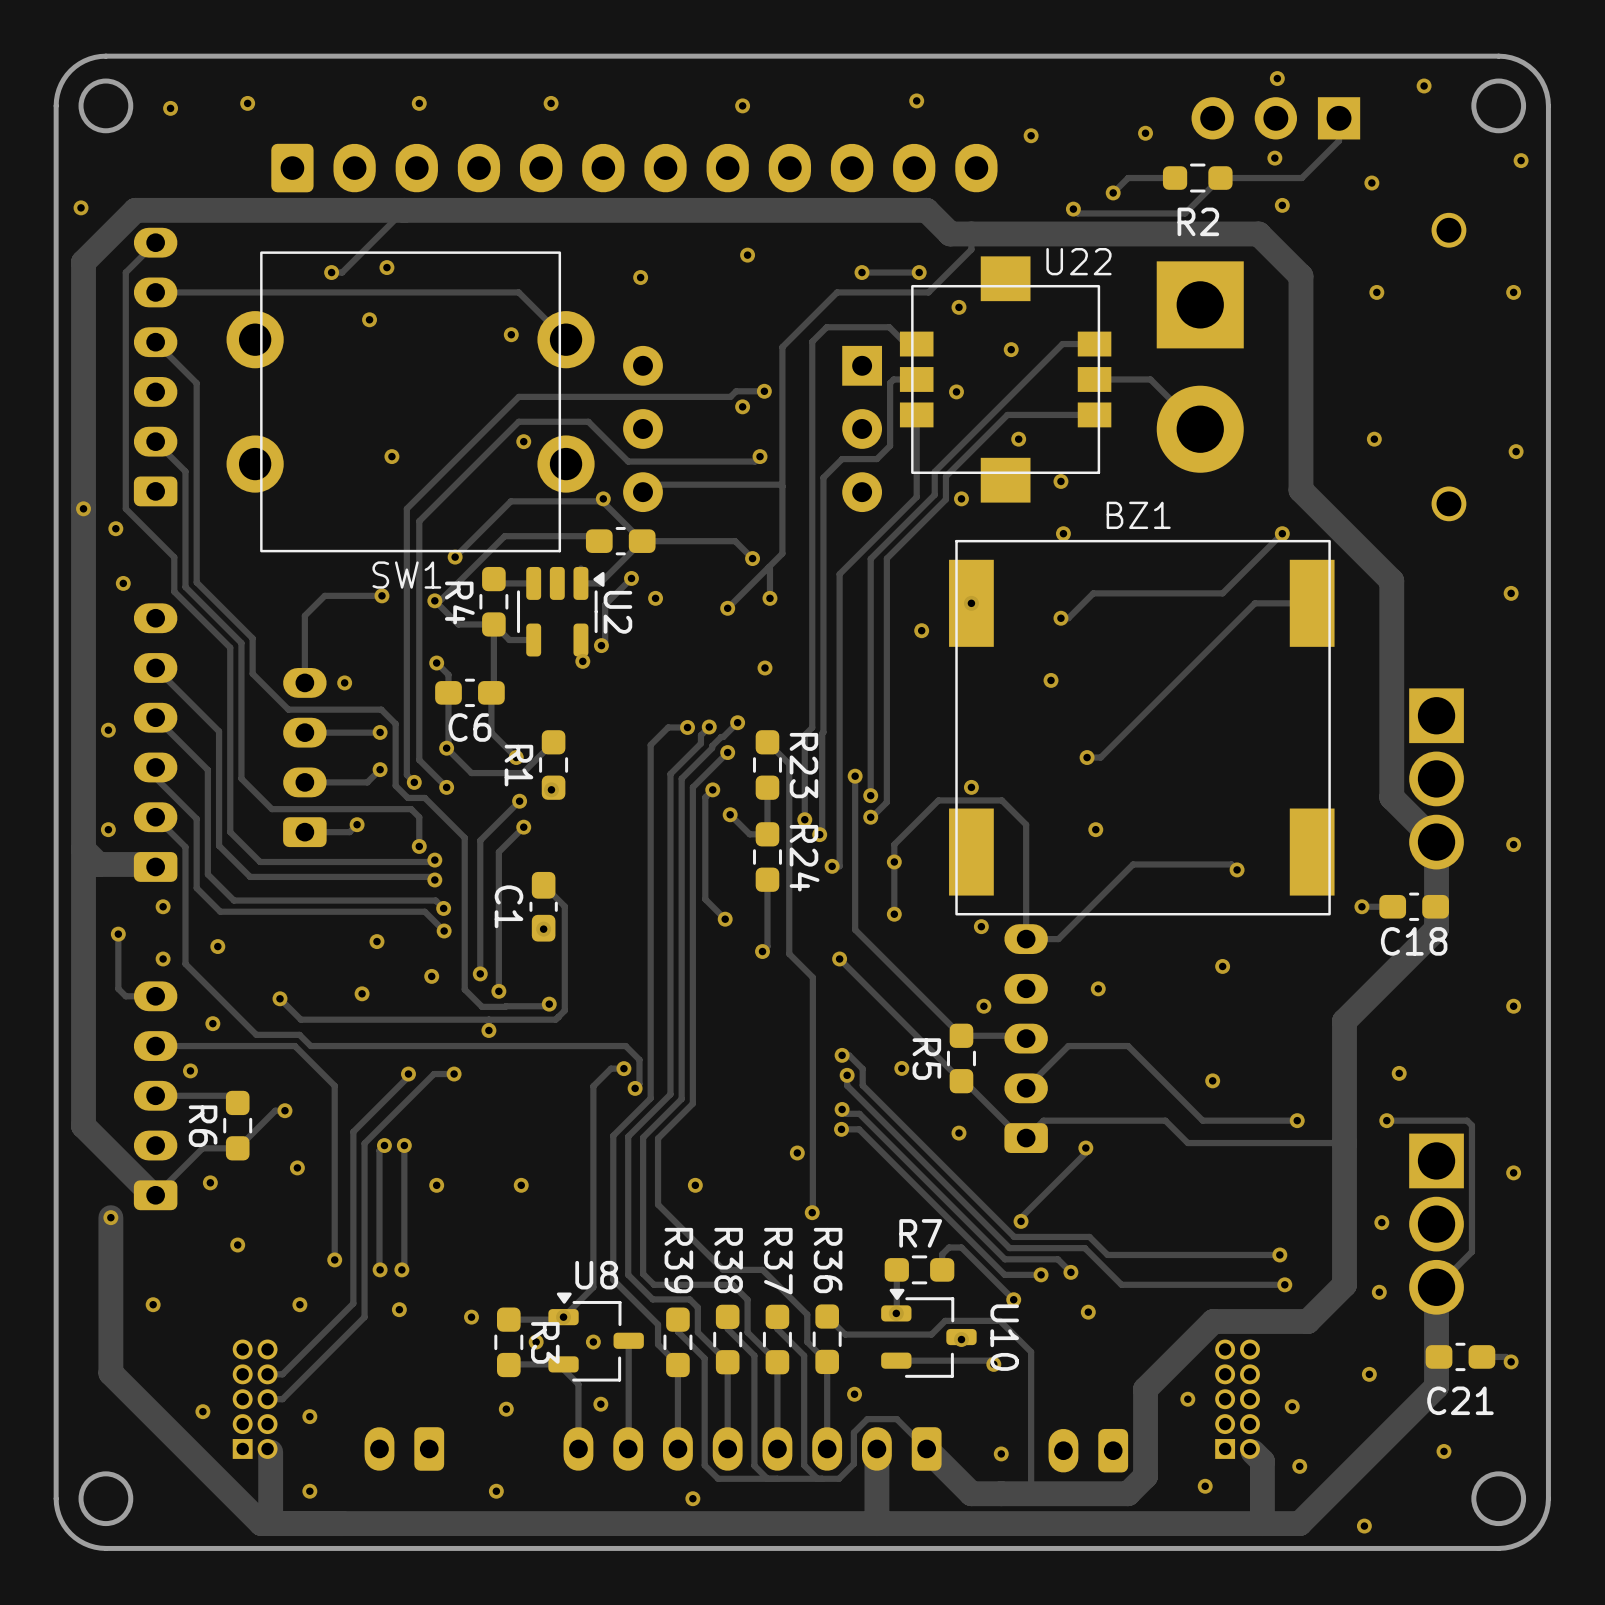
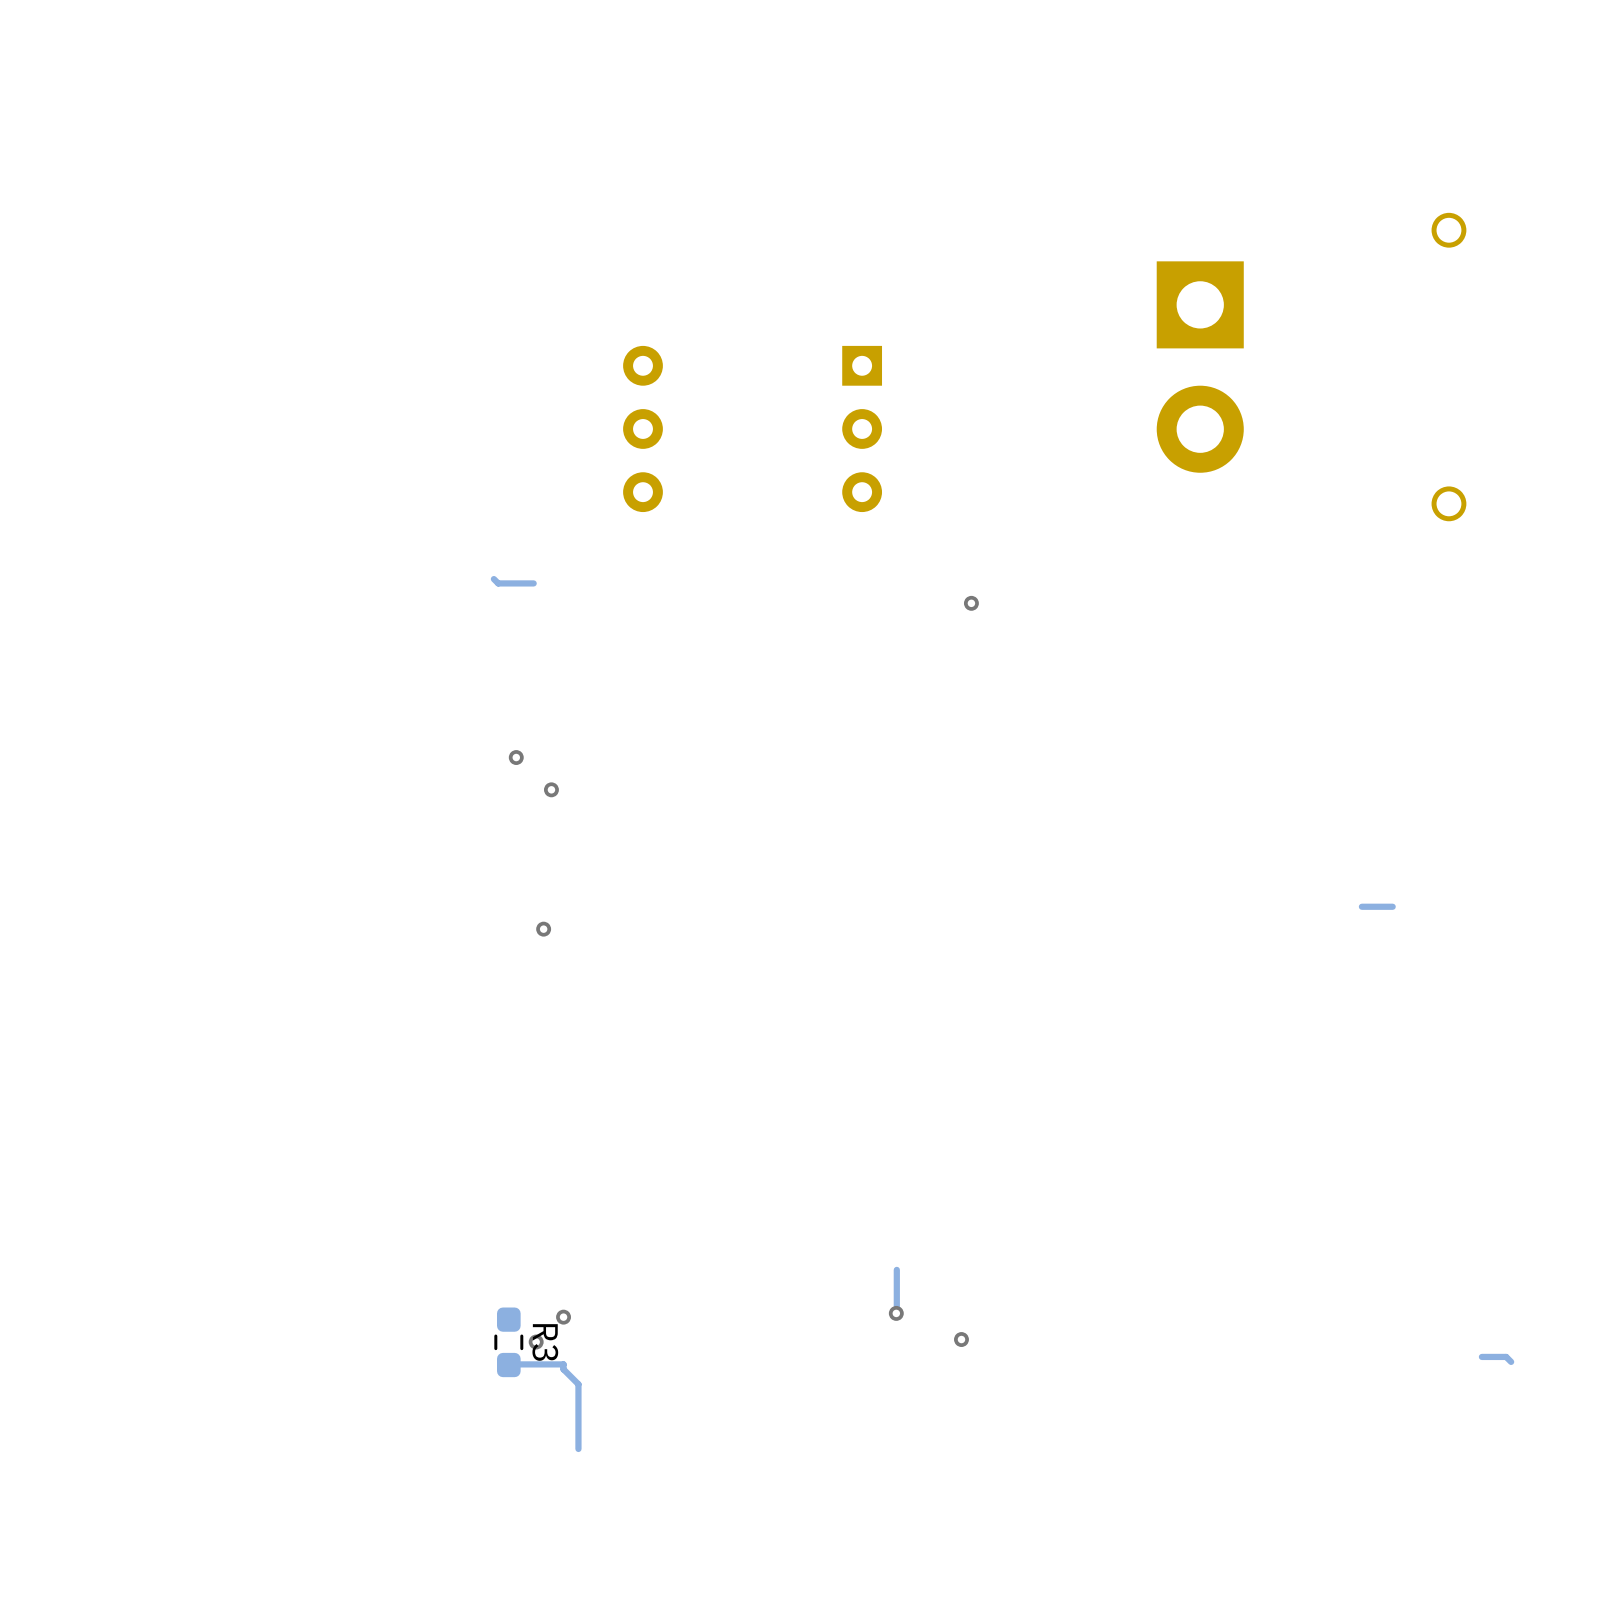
board edge: (1498, 56) (105, 56) (89, 58) (70, 70) (58, 89) (56, 105) (56, 1498) (61, 1520) (70, 1533) (89, 1545) (105, 1548) (1498, 1548) (1517, 1544) (1533, 1533) (1544, 1517) (1548, 1498) (1548, 105) (1544, 86) (1533, 70) (1517, 59) (1498, 56) -> none
round board edge: [78, 78, 134, 134] -> none
via: (1277, 78) -> none
round board edge: [1471, 78, 1527, 134] -> none
via: (1424, 86) -> none
via: (916, 100) -> none
via: (247, 103) -> none
via: (419, 103) -> none
via: (551, 103) -> none
via: (742, 105) -> none
via: (170, 108) -> none
part: (1275, 118) -> none
track: (1339, 118) (1339, 140) (1301, 178) (1220, 178) (1185, 213) (1077, 213) (1073, 209) -> none
via: (1145, 133) -> none
via: (1031, 135) -> none
via: (1274, 158) -> none
via: (1521, 160) -> none
part: (634, 168) -> none
track: (1175, 178) (1128, 178) (1113, 192) -> none
R2: (1197, 178) -> none
via: (1371, 183) -> none
via: (1113, 192) -> none
via: (1282, 205) -> none
via: (81, 207) -> none
via: (1073, 209) -> none
track: (404, 210) (342, 272) (331, 272) -> none
track: (971, 233) (971, 249) (928, 292) (837, 292) (782, 347) (782, 553) (727, 608) -> none
track: (155, 242) (125, 272) (125, 508) (174, 557) (174, 591) (230, 647) (230, 832) (260, 861) (430, 861) (434, 860) -> none
via: (747, 255) -> none
via: (386, 267) -> none
via: (331, 272) -> none
via: (861, 272) -> none
track: (919, 272) (861, 272) -> none
via: (919, 272) -> none
via: (640, 277) -> none
track: (155, 292) (518, 292) (566, 339) -> none
via: (1376, 292) -> none
via: (1513, 292) -> none
via: (958, 307) -> none
via: (369, 319) -> none
via: (511, 334) -> none
track: (155, 342) (196, 383) (196, 582) (252, 638) (252, 673) (288, 709) (381, 709) (395, 723) (395, 785) (407, 797) (424, 797) (464, 837) (464, 989) (482, 1006) (547, 1006) (549, 1004) -> none
track: (916, 344) (906, 344) (889, 327) (826, 327) (812, 341) (812, 727) (804, 735) (804, 819) -> none
track: (1094, 344) (1062, 344) (934, 471) (934, 494) (870, 558) (870, 795) -> none
via: (1011, 349) -> none
part: (155, 367) -> none
track: (916, 379) (893, 379) (890, 383) (890, 445) (876, 459) (842, 459) (823, 477) (823, 732) (822, 832) (819, 834) -> none
U22: (1005, 379) -> none
track: (1094, 379) (1150, 379) (1200, 429) -> none
track: (764, 391) (736, 391) (730, 396) (518, 396) (406, 508) (406, 774) (414, 782) -> none
via: (764, 391) -> none
via: (956, 391) -> none
SW1: (410, 401) -> none
via: (742, 406) -> none
track: (916, 414) (916, 497) (839, 574) (839, 866) -> none
track: (1094, 414) (1007, 414) (945, 476) (945, 499) (886, 558) (886, 802) (870, 817) -> none
via: (1018, 439) -> none
via: (1374, 439) -> none
track: (155, 441) (185, 471) (185, 587) (241, 643) (241, 778) (271, 809) (411, 809) (419, 817) (419, 846) -> none
via: (523, 441) -> none
via: (1516, 451) -> none
via: (391, 456) -> none
track: (760, 456) (755, 461) (628, 461) (588, 421) (518, 421) (419, 521) (419, 760) (446, 787) -> none
via: (760, 456) -> none
track: (643, 476) (643, 492) (650, 484) (780, 484) (782, 486) -> none
via: (1060, 481) -> none
via: (603, 498) -> none
via: (961, 498) -> none
via: (83, 508) -> none
via: (115, 528) -> none
via: (1063, 533) -> none
track: (1282, 533) (1222, 593) (1093, 593) (1068, 618) (1060, 618) -> none
via: (1282, 533) -> none
track: (599, 541) (594, 536) (504, 536) (440, 600) (434, 600) -> none
part: (620, 541) -> none
track: (642, 541) (735, 541) (752, 558) -> none
track: (642, 541) (602, 501) (510, 501) (455, 557) -> none
track: (642, 541) (599, 583) (580, 583) (580, 568) -> none
via: (455, 557) -> none
via: (752, 558) -> none
track: (768, 567) (769, 598) -> none
track: (631, 578) (605, 604) (605, 641) (601, 645) -> none
via: (631, 578) -> none
via: (123, 583) -> none
via: (1511, 593) -> none
track: (381, 595) (324, 595) (304, 615) (304, 682) -> none
via: (381, 595) -> none
via: (655, 598) -> none
via: (769, 598) -> none
track: (434, 600) (458, 624) (493, 624) (491, 732) (516, 757) -> none
via: (434, 600) -> none
R4: (493, 601) -> none
track: (1312, 603) (1254, 603) (1100, 757) (1087, 757) -> none
via: (727, 608) -> none
U2: (560, 611) -> none
via: (1060, 618) -> none
track: (492, 623) (509, 640) (533, 640) -> none
via: (921, 630) -> none
via: (601, 645) -> none
via: (582, 661) -> none
track: (436, 663) (448, 674) (448, 746) (446, 748) (471, 773) (522, 773) (553, 742) -> none
via: (436, 663) -> none
track: (155, 667) (219, 731) (219, 845) (250, 876) (431, 876) (434, 879) -> none
via: (764, 667) -> none
via: (1051, 680) -> none
via: (344, 682) -> none
C6: (469, 692) -> none
track: (155, 717) (207, 769) (207, 874) (233, 900) (435, 900) (443, 908) -> none
track: (737, 722) (681, 778) (681, 1099) (643, 1137) (643, 1273) (653, 1284) (732, 1284) (747, 1299) (747, 1332) (777, 1362) (777, 1448) -> none
via: (737, 722) -> none
track: (687, 727) (668, 727) (650, 745) (650, 1098) (613, 1135) (613, 1279) (658, 1324) (658, 1344) (677, 1364) (677, 1448) -> none
via: (687, 727) -> none
track: (709, 727) (700, 735) (700, 743) (670, 774) (670, 1094) (628, 1136) (628, 1274) (652, 1299) (689, 1299) (697, 1307) (697, 1332) (727, 1362) (727, 1448) -> none
via: (709, 727) -> none
BZ1: (1141, 727) -> none
via: (108, 730) -> none
track: (379, 732) (304, 732) -> none
via: (380, 732) -> none
part: (155, 742) -> none
track: (767, 742) (789, 764) (789, 953) (812, 977) (812, 1212) -> none
via: (446, 748) -> none
track: (727, 752) (692, 787) (692, 1103) (658, 1138) (658, 1204) (723, 1269) (762, 1269) (807, 1314) (807, 1342) (827, 1361) (827, 1448) -> none
via: (727, 752) -> none
part: (304, 757) -> none
via: (1087, 757) -> none
R1: (553, 764) -> none
R23: (767, 764) -> none
track: (155, 767) (155, 777) (196, 818) (196, 888) (220, 911) (424, 911) (444, 931) -> none
track: (380, 769) (367, 782) (304, 782) -> none
via: (380, 769) -> none
track: (855, 776) (855, 929) (961, 1035) (1023, 1035) (1026, 1038) -> none
via: (855, 776) -> none
part: (1436, 778) -> none
via: (414, 782) -> none
via: (446, 787) -> none
track: (767, 787) (767, 834) (749, 834) (730, 814) -> none
via: (971, 787) -> none
track: (712, 789) (705, 797) (705, 899) (725, 919) -> none
via: (712, 789) -> none
via: (870, 795) -> none
track: (519, 801) (480, 840) (480, 973) -> none
via: (519, 801) -> none
via: (730, 814) -> none
track: (155, 817) (185, 847) (185, 963) (256, 1034) (299, 1034) (310, 1046) (625, 1046) (639, 1059) (639, 1084) (635, 1088) -> none
via: (870, 817) -> none
via: (804, 819) -> none
track: (357, 824) (349, 832) (304, 832) -> none
via: (357, 824) -> none
track: (523, 827) (498, 852) (498, 991) -> none
via: (523, 827) -> none
via: (108, 829) -> none
via: (1095, 829) -> none
via: (819, 834) -> none
track: (1436, 842) (1436, 929) (1344, 1021) (1344, 1284) (1307, 1321) (1213, 1321) (1145, 1389) (1145, 1476) (1128, 1493) (971, 1493) (896, 1419) (867, 1419) (853, 1432) (853, 1463) (838, 1478) (718, 1478) (704, 1465) (704, 1358) (677, 1331) (677, 1319) -> none
track: (1436, 842) (1391, 797) (1391, 580) (1300, 490) (1300, 276) (1258, 233) (950, 233) (926, 210) (135, 210) (83, 262) (83, 1125) (152, 1195) (155, 1195) (202, 1148) (237, 1148) (275, 1110) (284, 1110) -> none
via: (1513, 844) -> none
via: (419, 846) -> none
track: (83, 849) (98, 864) (155, 864) -> none
R24: (767, 857) -> none
via: (434, 860) -> none
via: (894, 861) -> none
via: (832, 866) -> none
track: (1237, 869) (1231, 864) (1133, 864) (1058, 939) (1026, 939) (1026, 824) (1001, 800) (938, 800) (894, 844) (894, 914) -> none
via: (1237, 869) -> none
via: (434, 879) -> none
track: (767, 879) (767, 946) (762, 951) -> none
track: (543, 885) (564, 906) (564, 1010) (555, 1019) (300, 1019) (280, 998) -> none
via: (163, 906) -> none
C1: (543, 906) -> none
via: (1361, 906) -> none
C18: (1414, 906) -> none
via: (443, 908) -> none
via: (894, 914) -> none
via: (725, 919) -> none
via: (981, 926) -> none
via: (444, 931) -> none
track: (118, 934) (118, 988) (125, 996) (155, 996) -> none
via: (118, 934) -> none
via: (377, 941) -> none
via: (217, 946) -> none
via: (762, 951) -> none
via: (163, 958) -> none
track: (839, 958) (961, 1080) -> none
via: (839, 958) -> none
via: (1222, 966) -> none
via: (480, 973) -> none
via: (431, 976) -> none
via: (1098, 988) -> none
via: (498, 991) -> none
via: (362, 993) -> none
via: (280, 998) -> none
via: (549, 1004) -> none
via: (983, 1006) -> none
via: (1513, 1006) -> none
via: (212, 1023) -> none
via: (488, 1030) -> none
part: (1026, 1038) -> none
track: (155, 1046) (294, 1046) (334, 1085) (334, 1259) -> none
track: (842, 1055) (849, 1055) (862, 1068) (862, 1085) (1014, 1236) (1089, 1236) (1107, 1254) (1279, 1254) -> none
via: (842, 1055) -> none
R5: (961, 1058) -> none
track: (623, 1068) (611, 1068) (593, 1086) (593, 1287) (561, 1319) (508, 1319) -> none
via: (623, 1068) -> none
via: (901, 1068) -> none
via: (190, 1070) -> none
via: (1399, 1073) -> none
track: (408, 1074) (408, 1076) (353, 1131) (353, 1303) (282, 1374) (267, 1374) -> none
via: (408, 1074) -> none
track: (454, 1074) (433, 1074) (364, 1143) (364, 1317) (282, 1399) (267, 1399) -> none
via: (454, 1074) -> none
track: (847, 1075) (847, 1085) (1009, 1248) (1084, 1248) (1121, 1284) (1284, 1284) -> none
via: (847, 1075) -> none
via: (1212, 1080) -> none
track: (961, 1081) (964, 1081) (1021, 1138) (1026, 1138) (1043, 1120) (1165, 1120) (1187, 1143) (1344, 1143) -> none
via: (635, 1088) -> none
track: (1026, 1088) (1068, 1046) (1128, 1046) (1202, 1120) (1297, 1120) -> none
track: (155, 1095) (230, 1095) (237, 1102) -> none
part: (155, 1095) -> none
track: (842, 1109) (846, 1113) (859, 1113) (1004, 1259) (1057, 1259) (1070, 1272) -> none
via: (842, 1109) -> none
via: (284, 1110) -> none
via: (1297, 1120) -> none
track: (1386, 1120) (1467, 1120) (1471, 1125) (1471, 1251) (1436, 1287) (1436, 1386) (1299, 1523) (261, 1523) (110, 1373) (110, 1217) -> none
via: (1386, 1120) -> none
R6: (237, 1125) -> none
track: (841, 1129) (859, 1129) (1004, 1274) (1041, 1274) -> none
via: (841, 1129) -> none
via: (958, 1133) -> none
track: (384, 1145) (379, 1150) (380, 1269) -> none
via: (384, 1145) -> none
track: (404, 1145) (404, 1267) (401, 1269) -> none
via: (404, 1145) -> none
track: (1085, 1148) (1085, 1152) (1021, 1217) (1021, 1221) -> none
via: (1085, 1148) -> none
via: (797, 1152) -> none
via: (297, 1167) -> none
via: (1513, 1172) -> none
via: (210, 1182) -> none
via: (436, 1185) -> none
via: (521, 1185) -> none
via: (695, 1185) -> none
via: (812, 1212) -> none
via: (110, 1217) -> none
via: (1021, 1221) -> none
via: (1381, 1222) -> none
part: (1436, 1224) -> none
via: (237, 1245) -> none
via: (1279, 1254) -> none
via: (334, 1259) -> none
via: (380, 1269) -> none
via: (401, 1269) -> none
R7: (919, 1269) -> none
track: (942, 1269) (942, 1254) (949, 1247) (961, 1247) (1013, 1299) -> none
via: (1070, 1272) -> none
via: (1041, 1274) -> none
via: (1284, 1284) -> none
via: (1379, 1292) -> none
via: (1013, 1299) -> none
via: (153, 1304) -> none
via: (299, 1304) -> none
via: (399, 1309) -> none
via: (1088, 1312) -> none
track: (777, 1316) (777, 1328) (804, 1355) (804, 1465) (817, 1478) -> none
track: (827, 1316) (845, 1334) (931, 1334) (945, 1320) (1000, 1320) (1031, 1351) (1031, 1493) (1001, 1493) -> none
via: (471, 1317) -> none
track: (724, 1319) (727, 1316) (727, 1328) (754, 1355) (754, 1465) (767, 1478) -> none
U10: (928, 1333) -> none
U8: (596, 1337) -> none
R38: (727, 1339) -> none
R37: (777, 1339) -> none
R36: (827, 1339) -> none
track: (628, 1340) (628, 1448) -> none
via: (593, 1342) -> none
R39: (677, 1342) -> none
C21: (1460, 1356) -> none
track: (896, 1360) (990, 1360) (993, 1364) -> none
via: (1511, 1361) -> none
via: (993, 1364) -> none
via: (1369, 1374) -> none
via: (854, 1394) -> none
part: (255, 1399) -> none
via: (1187, 1399) -> none
part: (1237, 1399) -> none
via: (600, 1404) -> none
via: (1292, 1406) -> none
via: (506, 1409) -> none
via: (202, 1411) -> none
via: (309, 1416) -> none
part: (404, 1448) -> none
part: (752, 1448) -> none
track: (876, 1448) (876, 1523) -> none
part: (1088, 1450) -> none
via: (1443, 1451) -> none
track: (270, 1452) (270, 1523) -> none
track: (1253, 1452) (1262, 1461) (1262, 1523) -> none
via: (1001, 1453) -> none
via: (1299, 1466) -> none
round board edge: [78, 1471, 134, 1527] -> none
round board edge: [1471, 1471, 1527, 1527] -> none
via: (1205, 1486) -> none
via: (309, 1491) -> none
via: (496, 1491) -> none
via: (692, 1498) -> none
via: (1364, 1526) -> none

